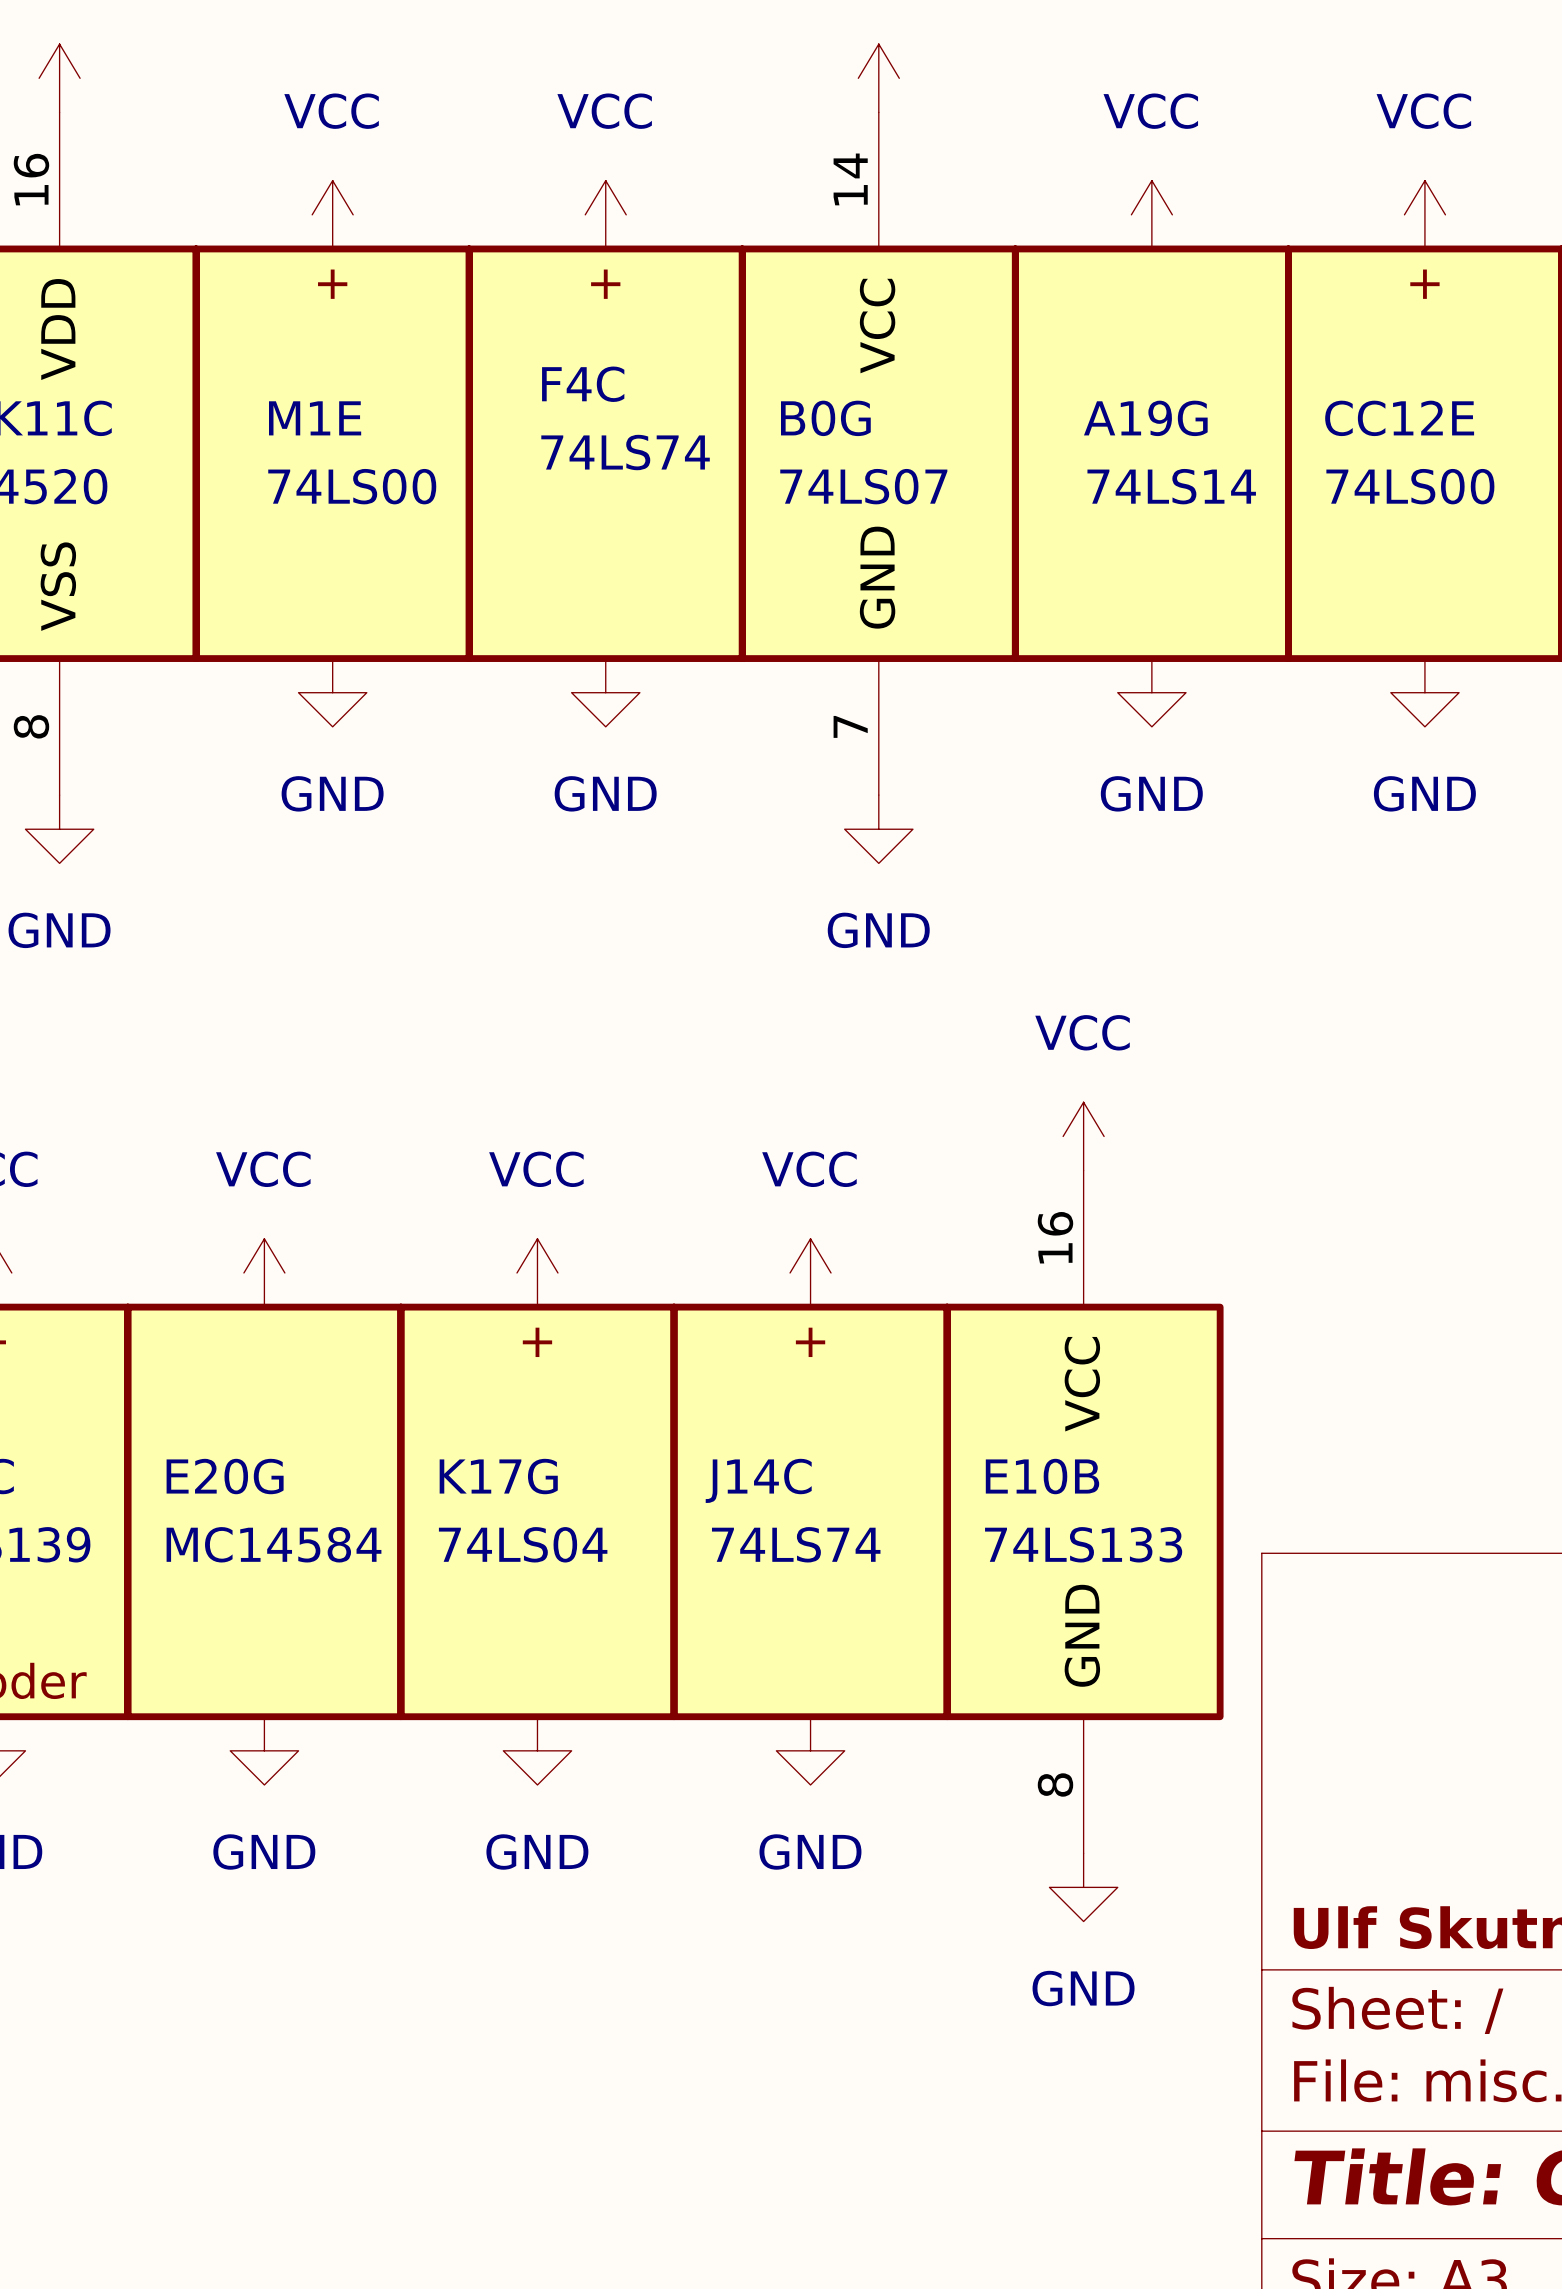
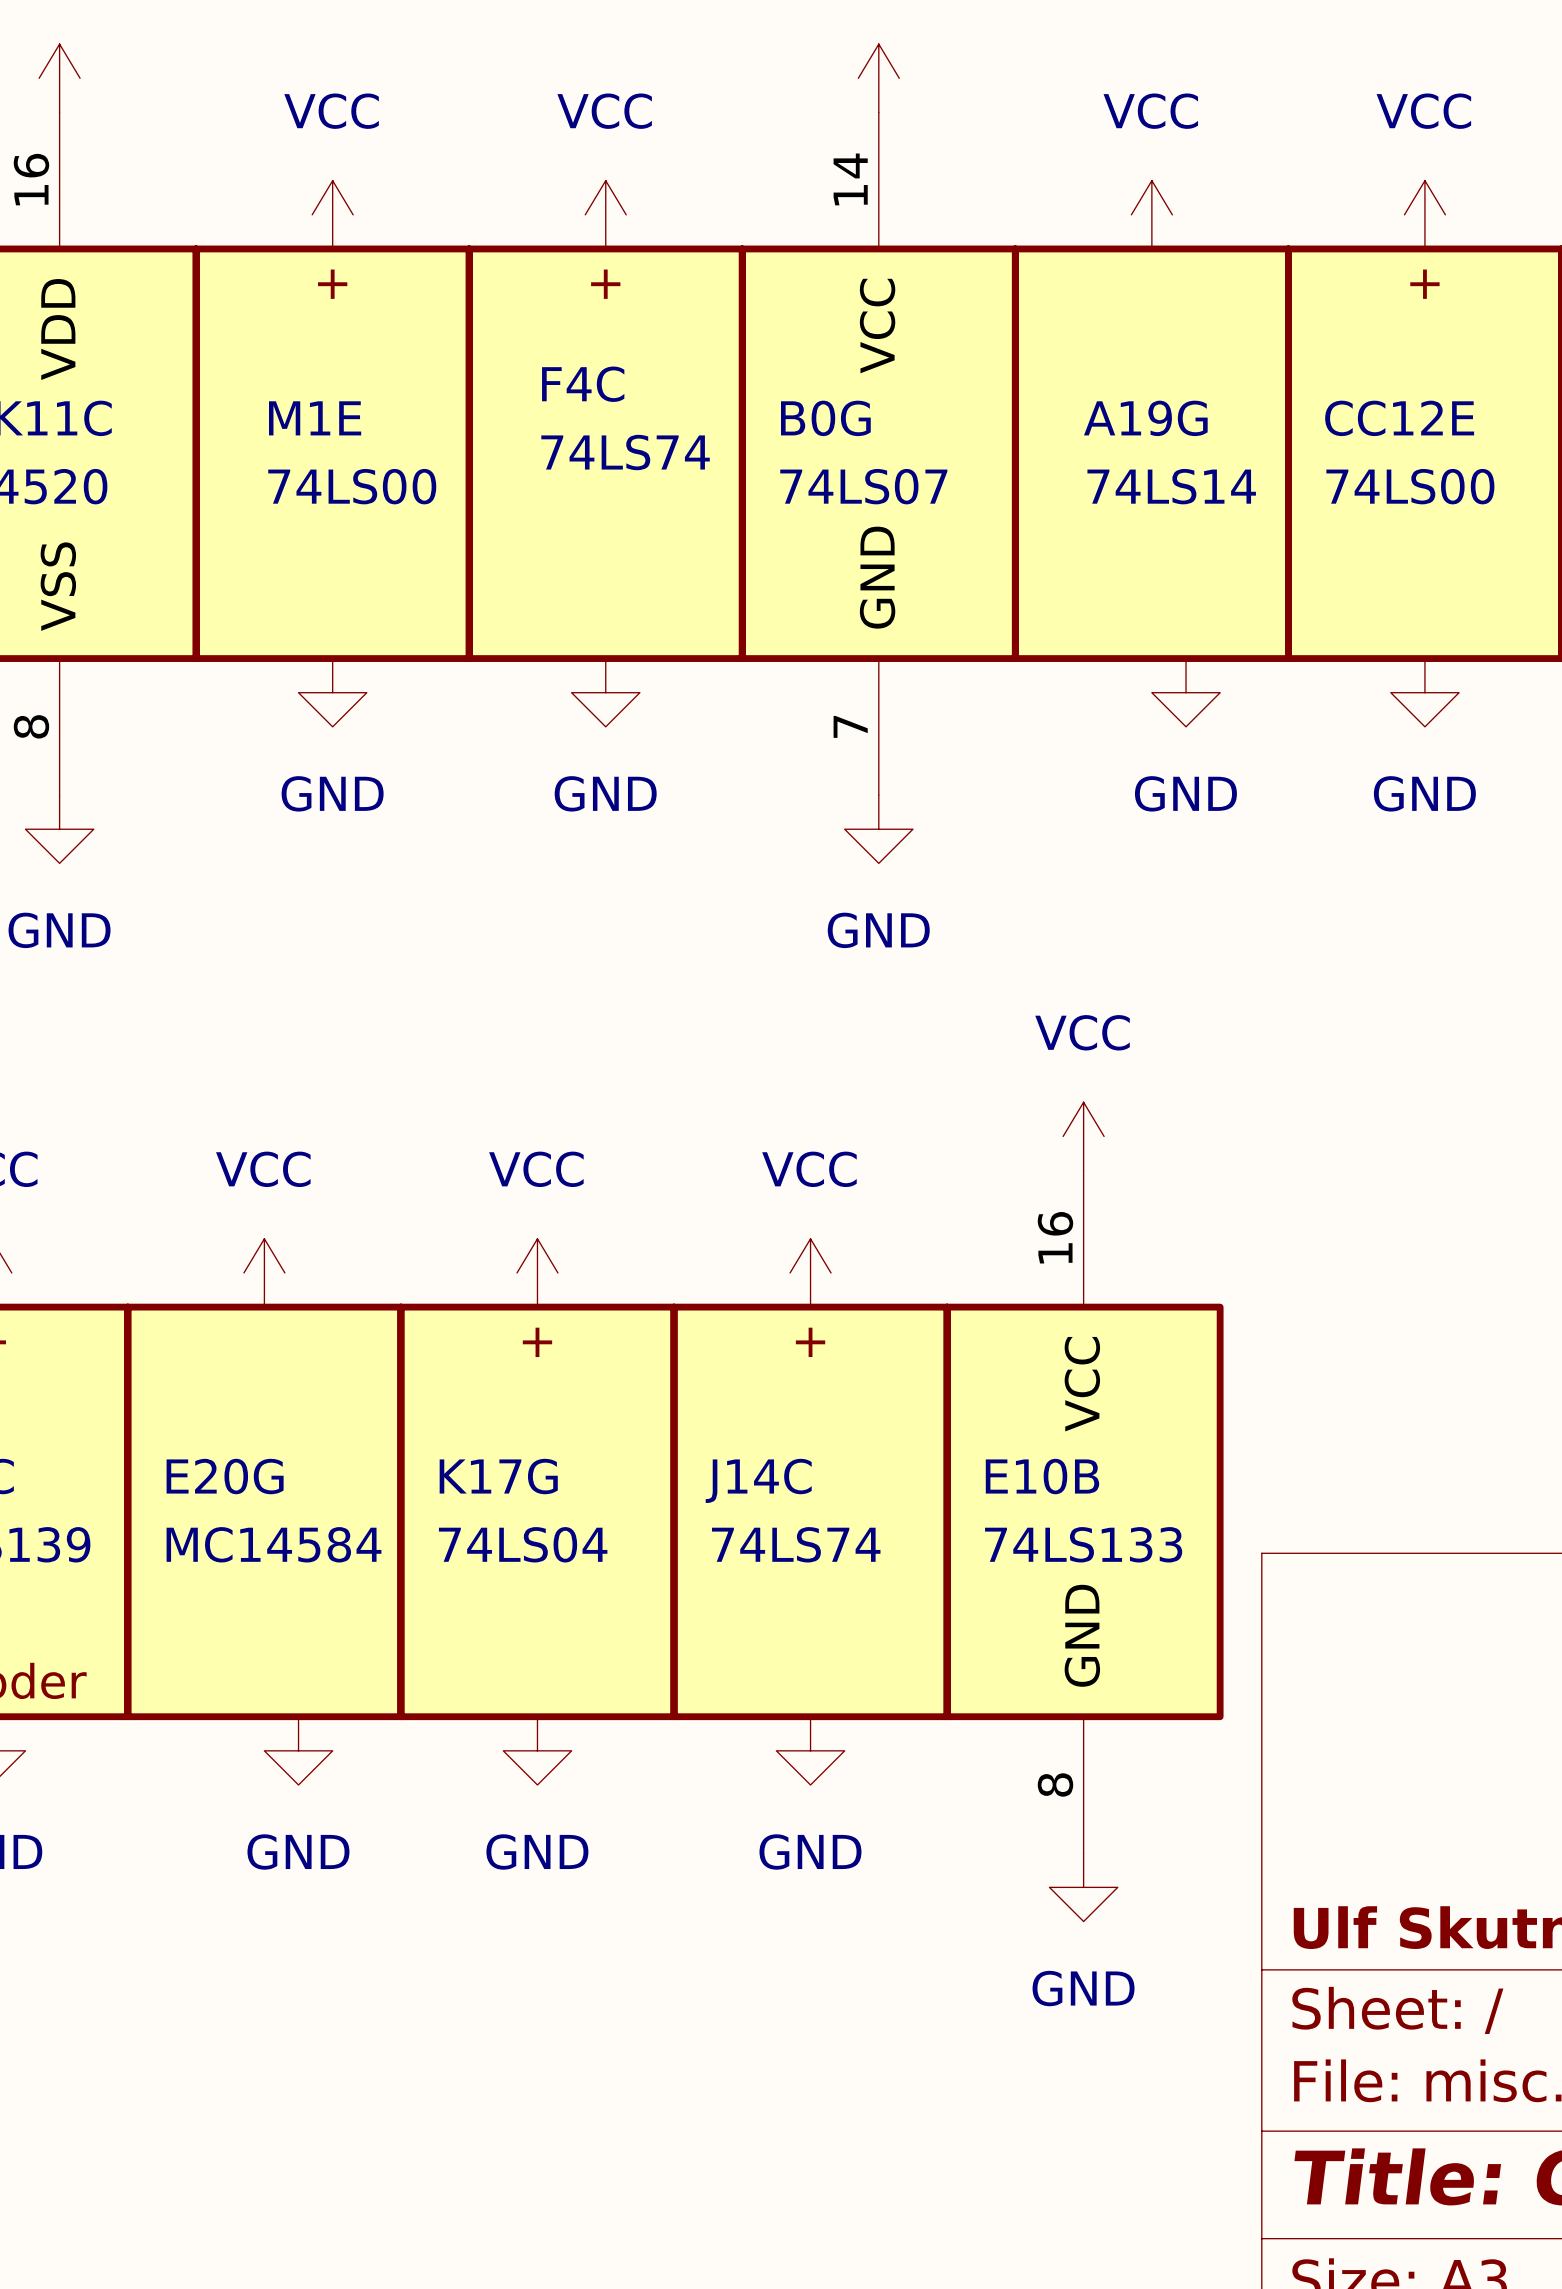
power symbol position: GND (1151, 692) -> GND (1186, 692)
power symbol position: GND (264, 1750) -> GND (298, 1750)

